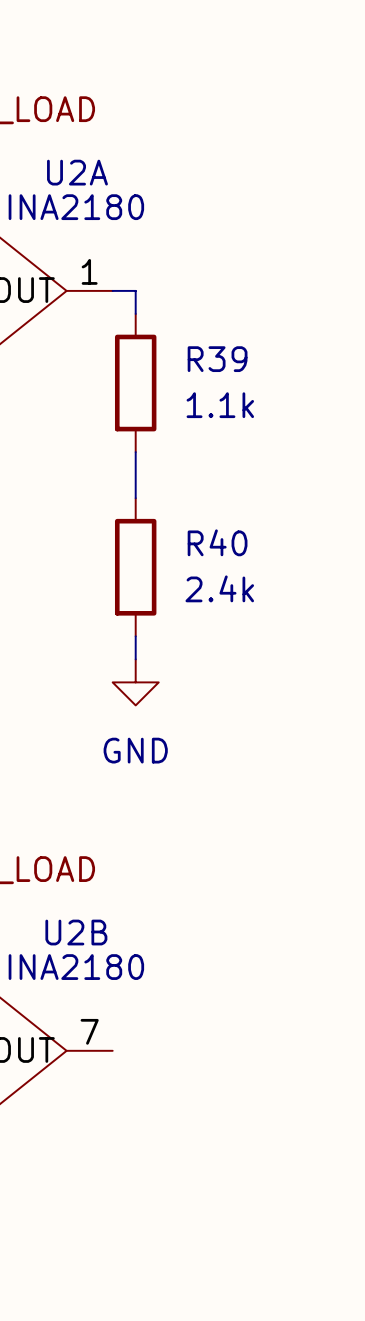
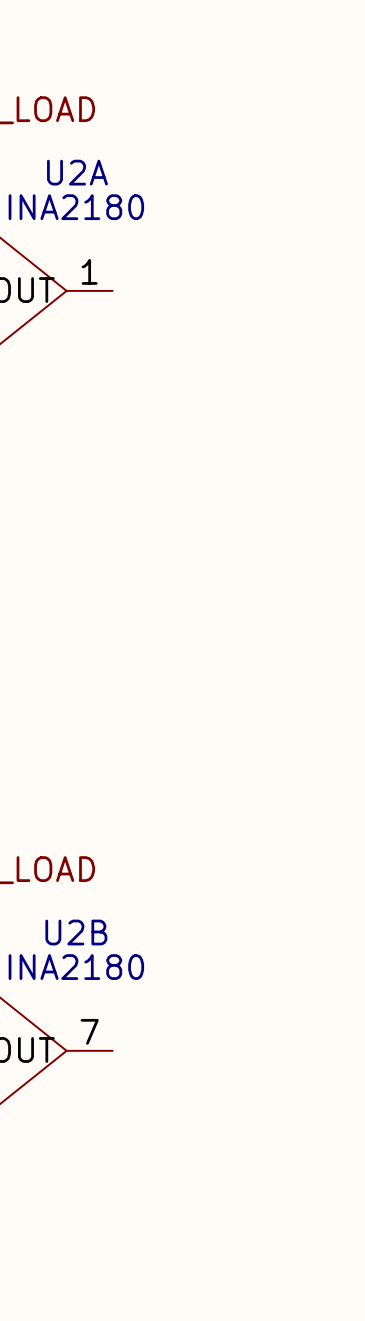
wire: (112, 290) (135, 290) (135, 313) -> none
R39: 1.1k (135, 383) -> none
wire: (135, 452) (135, 498) -> none
R40: 2.4k (135, 567) -> none
wire: (135, 636) (135, 659) -> none
power symbol: GND (135, 682) -> none

